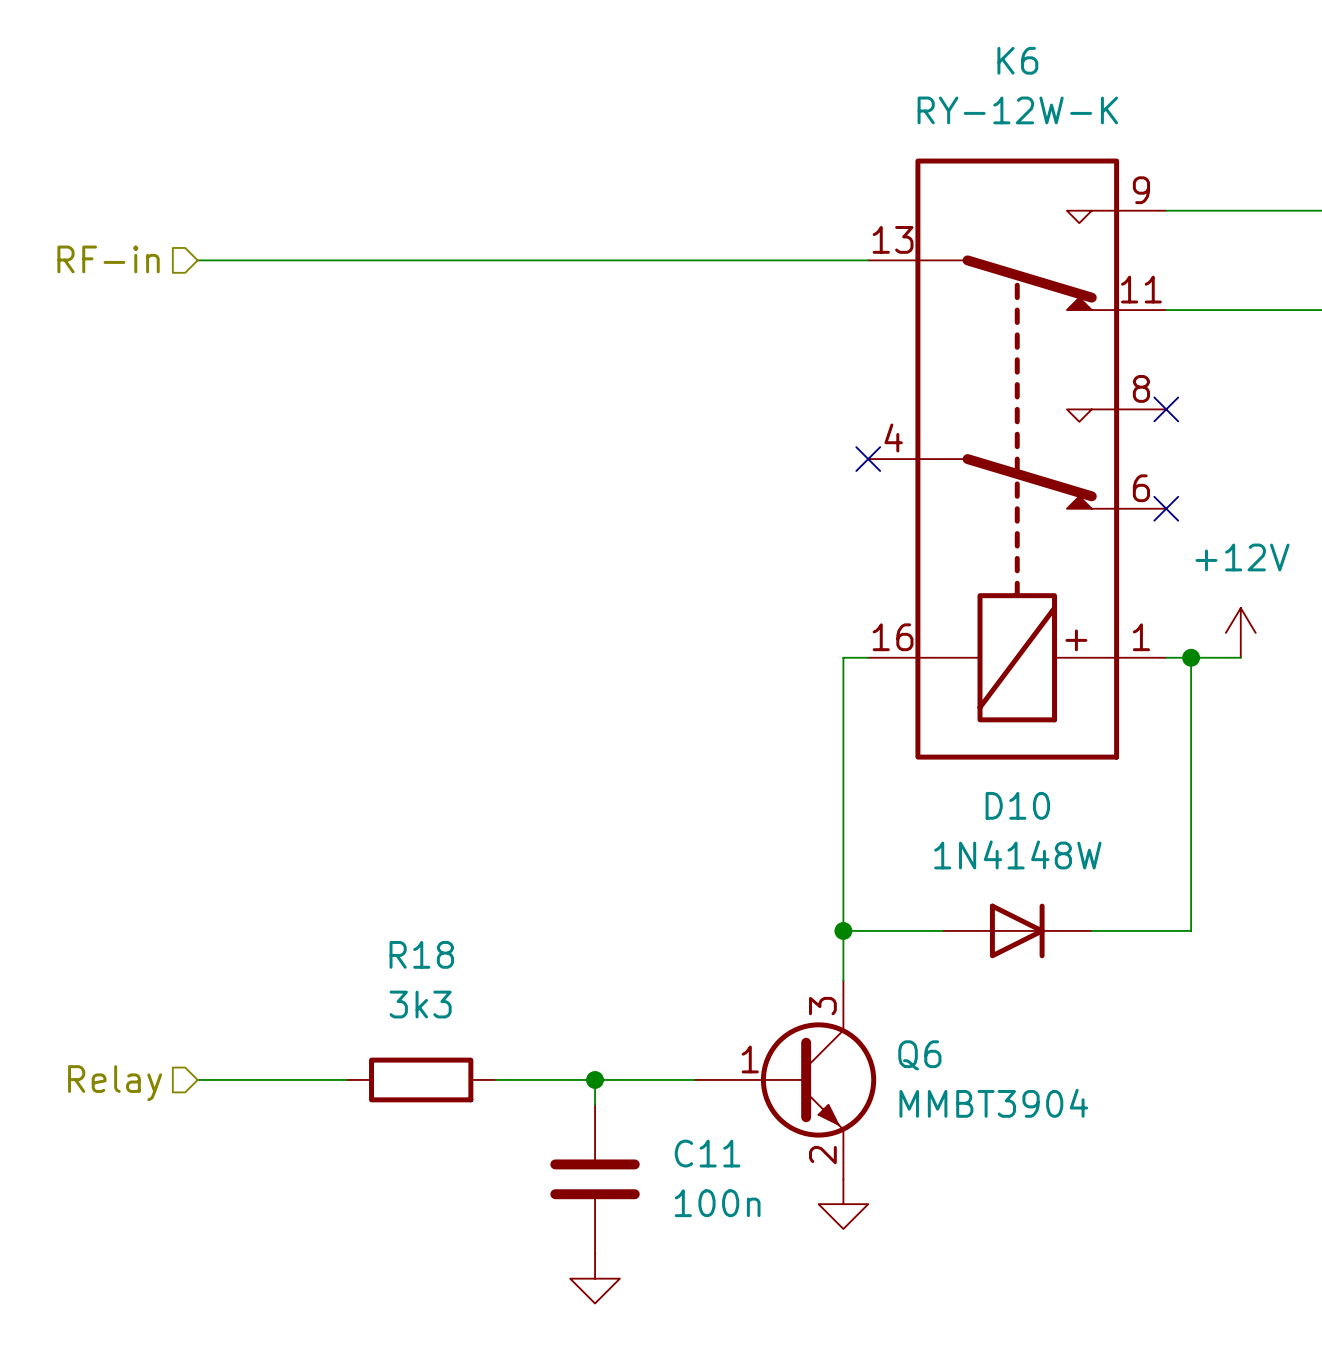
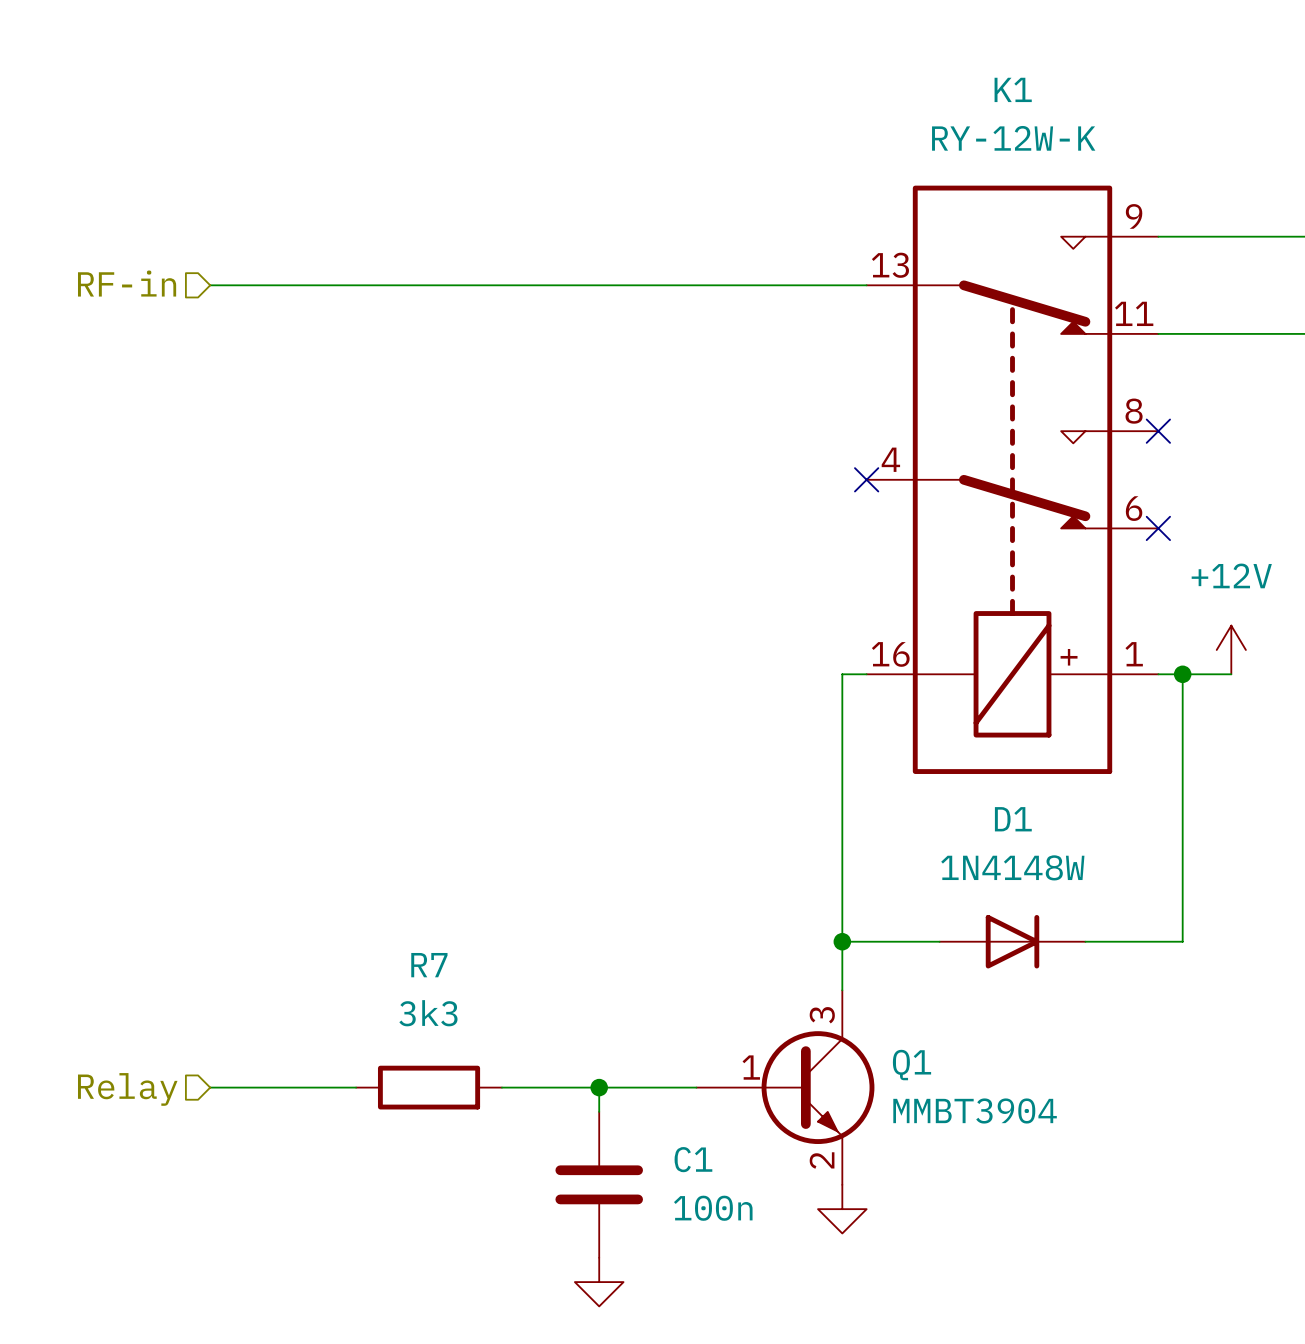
K6 name: K6 (1017, 60) -> K1 (1013, 89)
D10 name: D10 (1017, 805) -> D1 (1013, 819)
R18 name: R18 (421, 954) -> R7 (429, 965)
Q6 name: Q6 (919, 1055) -> Q1 (912, 1065)
C11 name: C11 (707, 1153) -> C1 (693, 1159)

